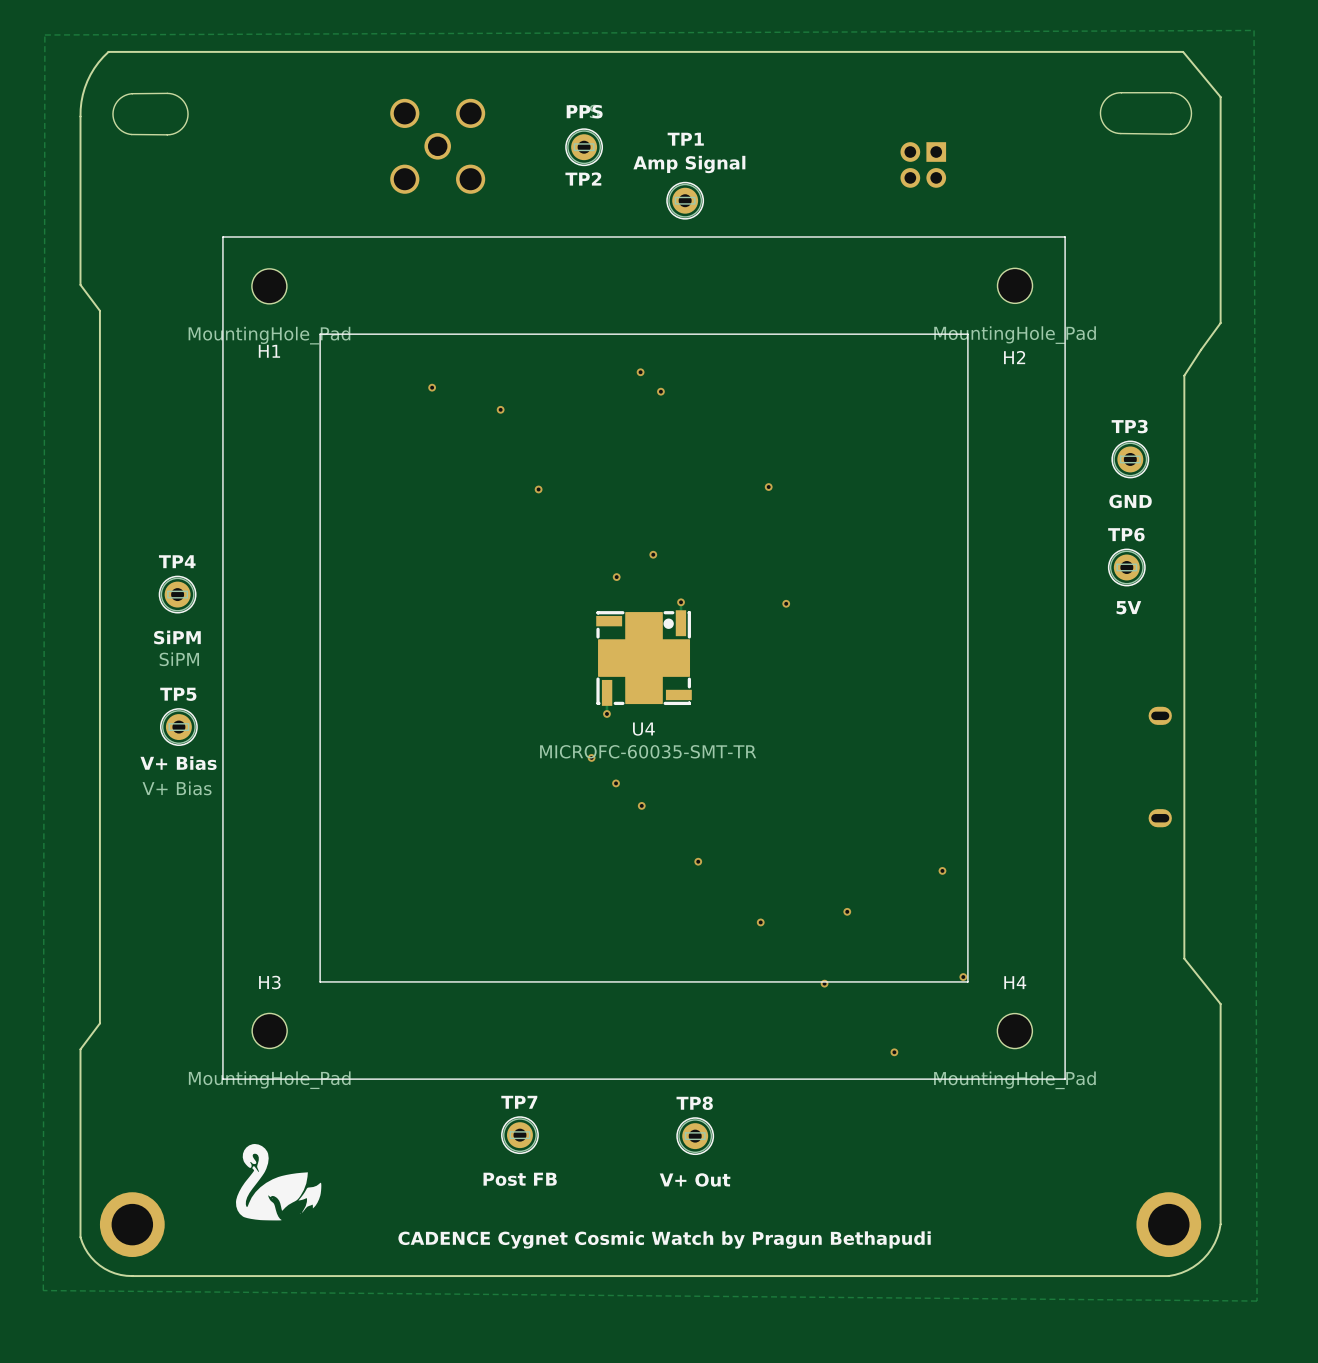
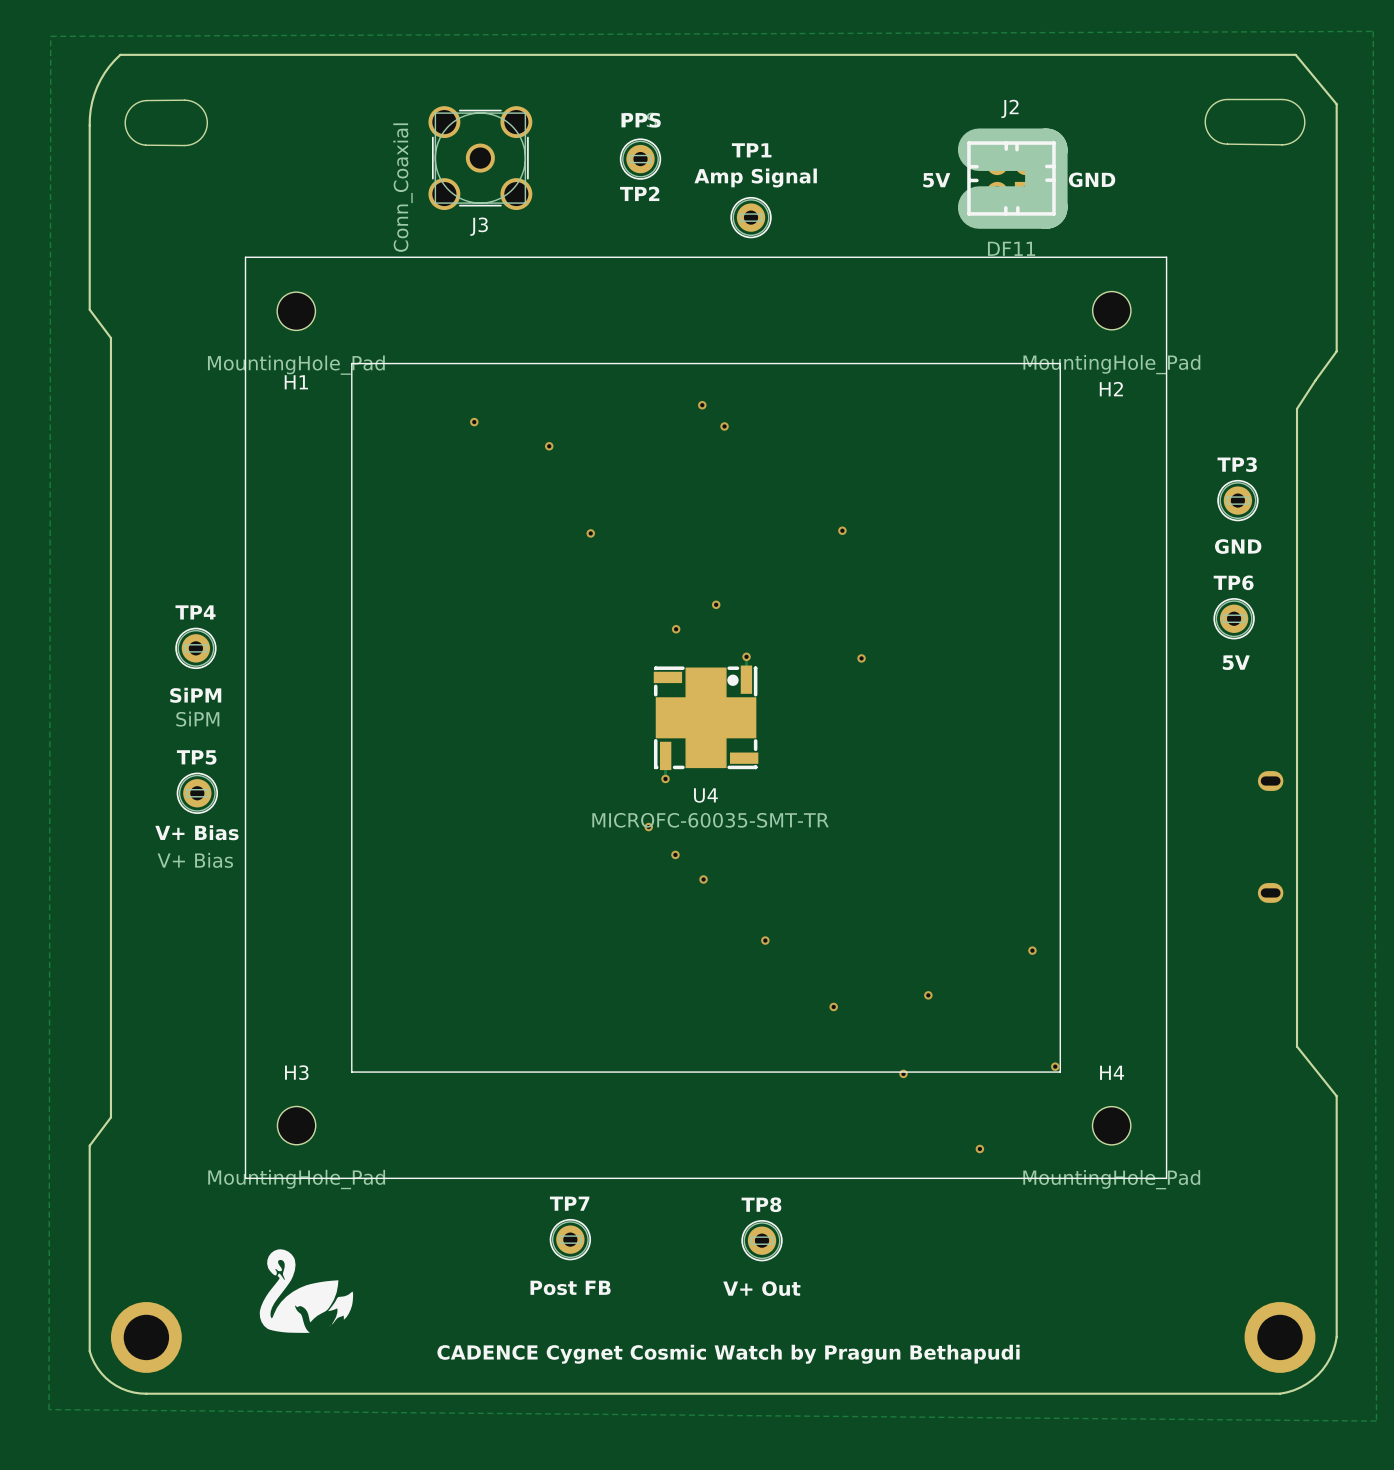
J3 side: bottom (437, 146) -> top (480, 158)
J2 side: bottom (923, 164) -> top (1012, 178)
text: none -> 5V (936, 180)
text: none -> GND (1092, 179)

